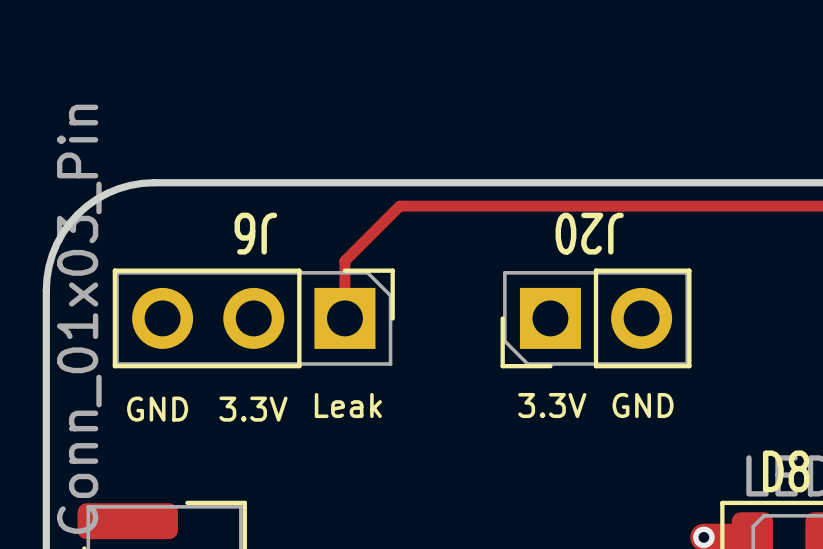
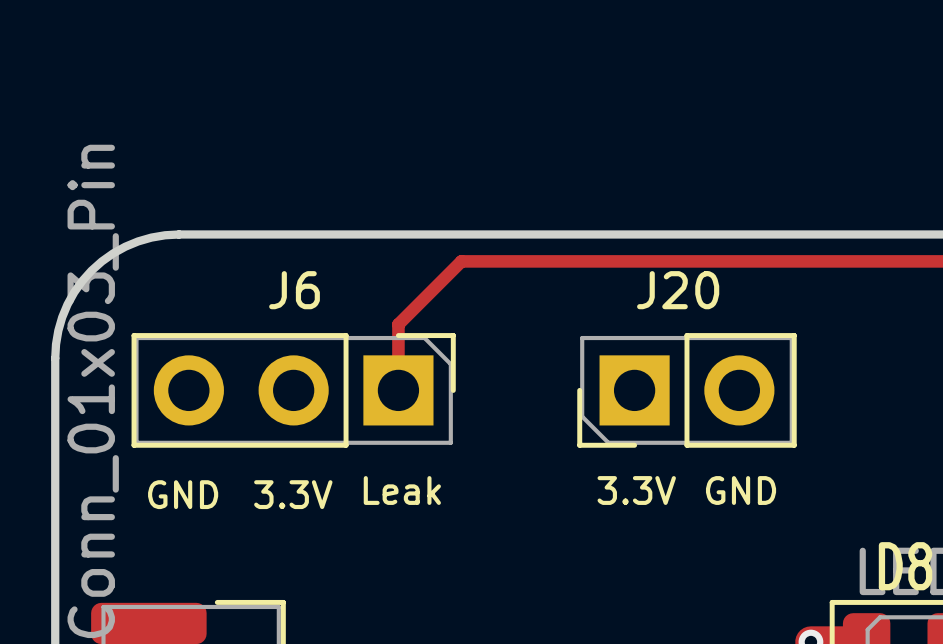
J6 name rotation: 0° (255, 233) -> 180° (294, 290)
J20 name rotation: 0° (589, 233) -> 180° (678, 290)

